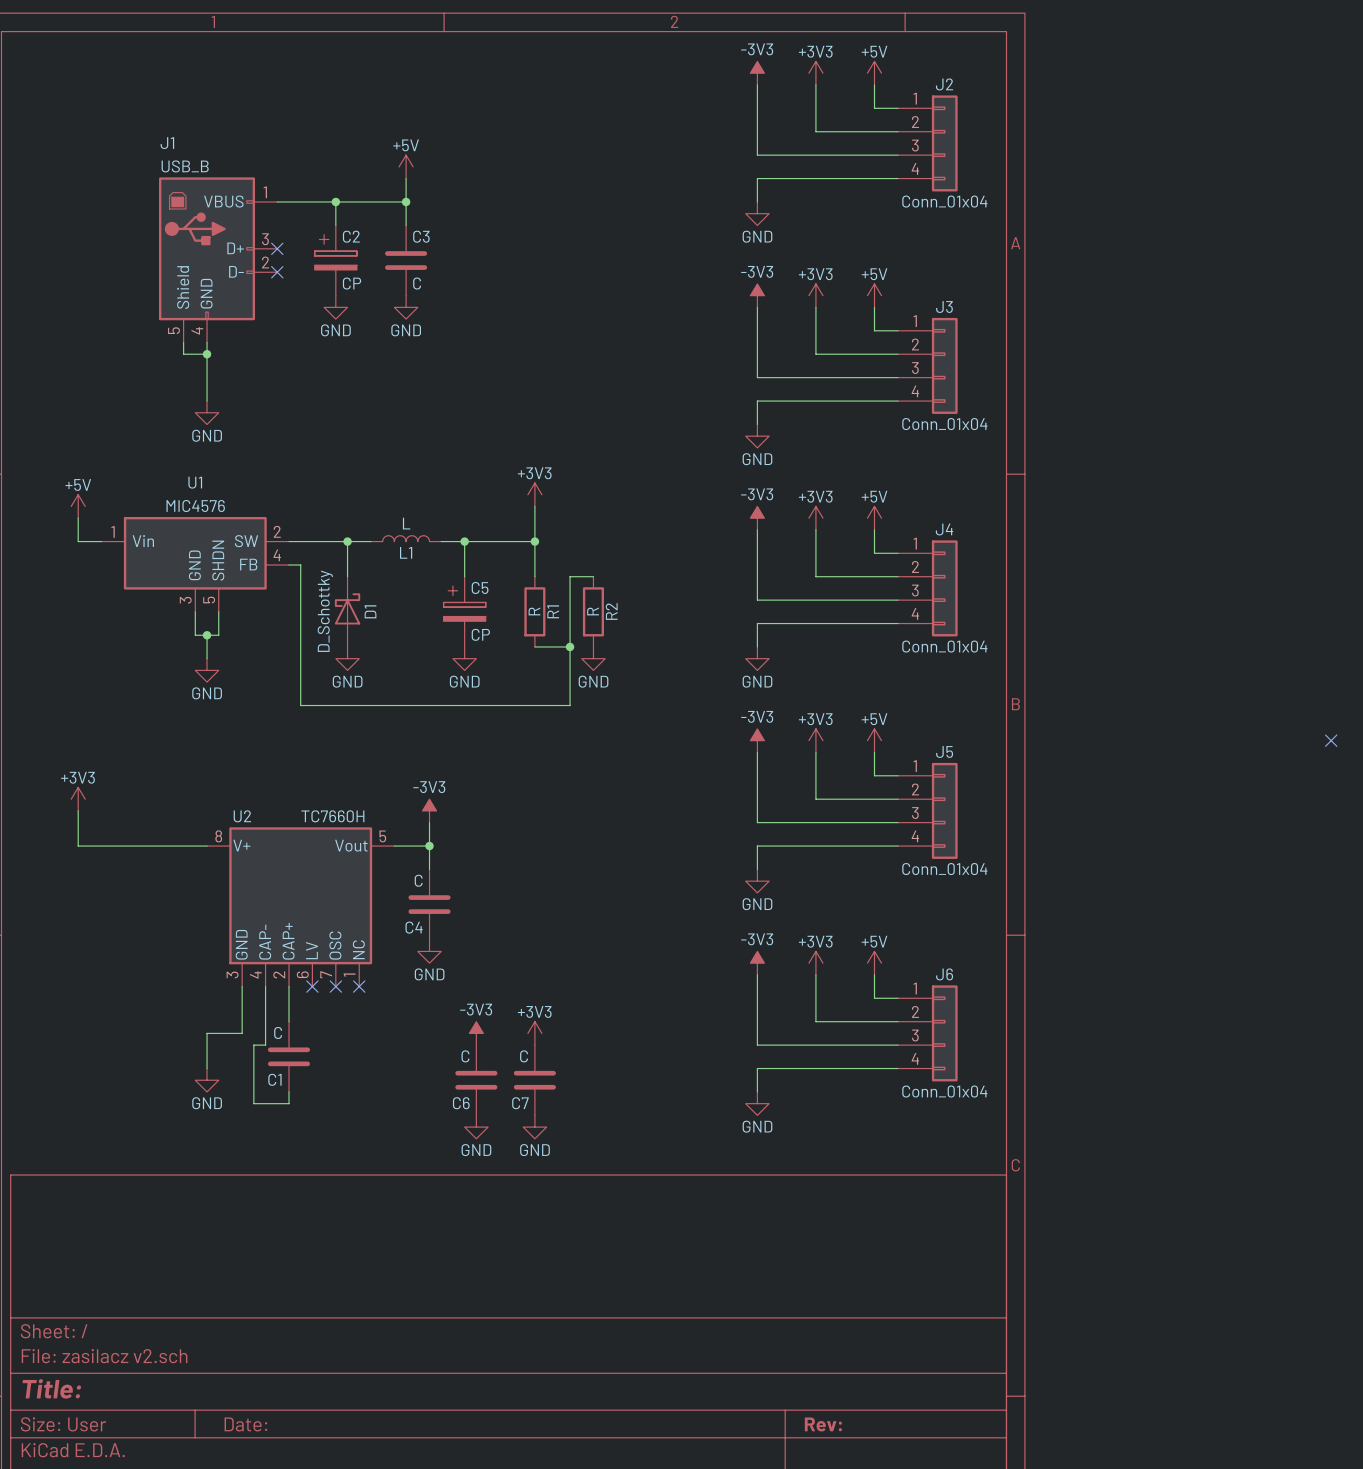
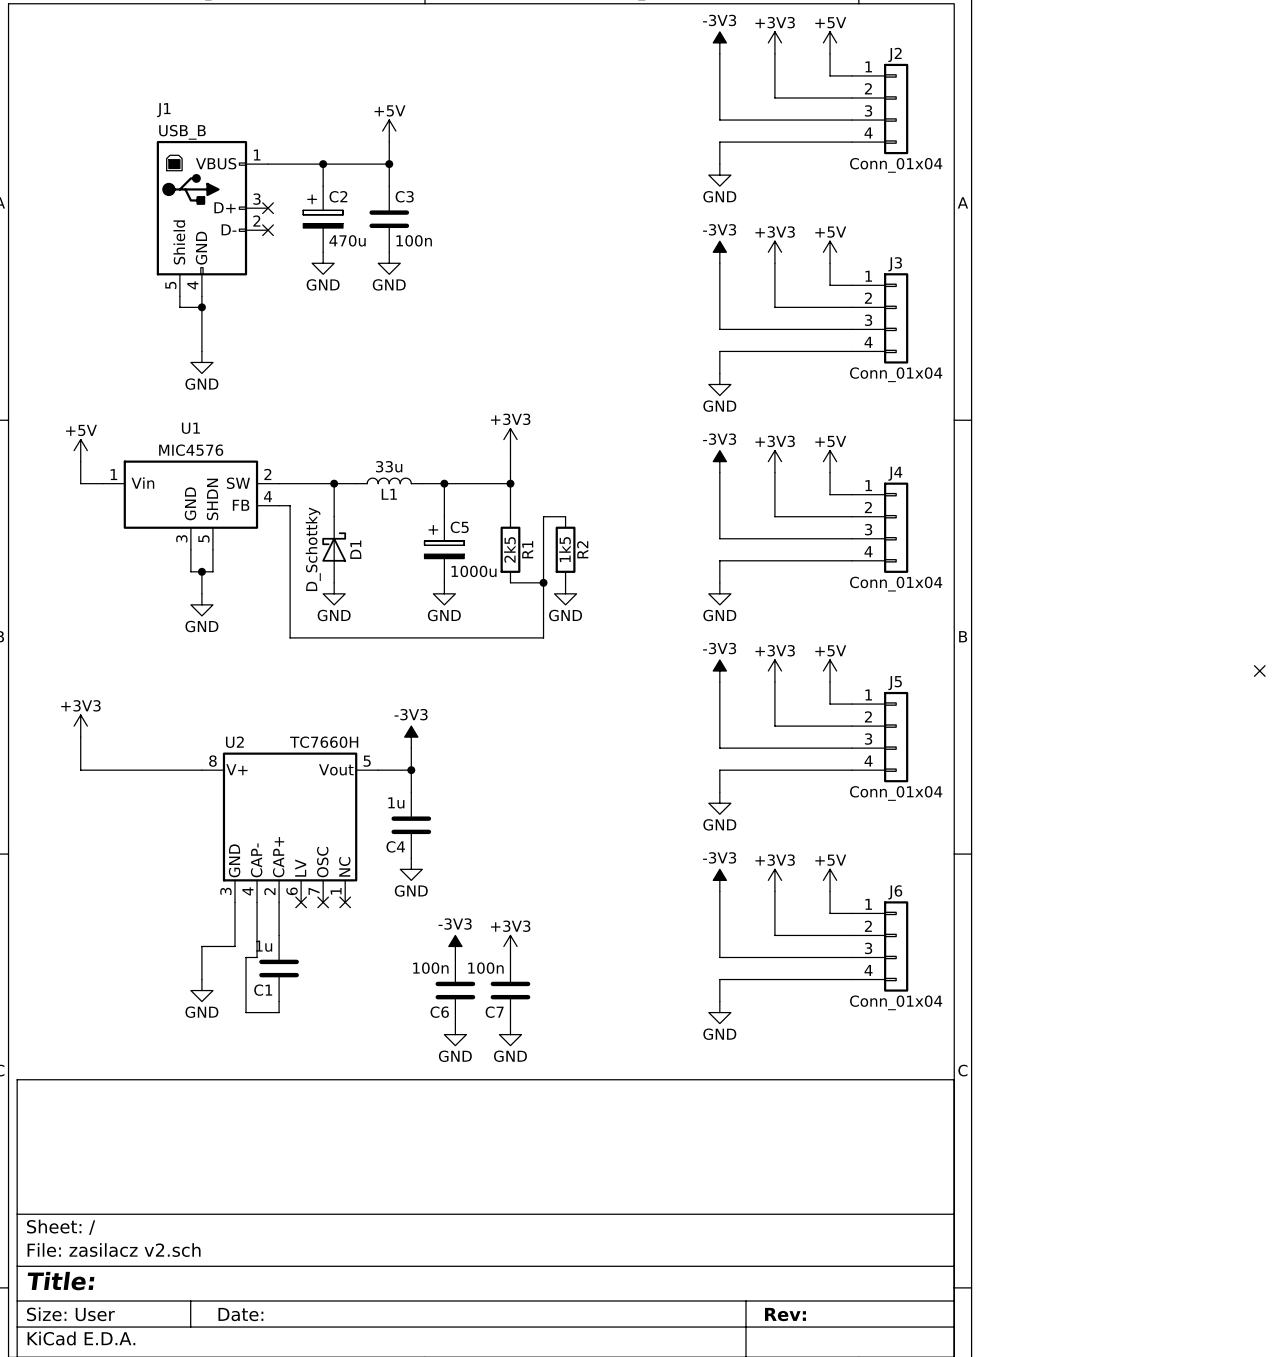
C2 value: CP (352, 283) -> 470u (347, 240)
C3 value: C (417, 283) -> 100n (414, 240)
L1 value: L (406, 523) -> 33u (389, 466)
R1 value: R (534, 611) -> 2k5 (509, 549)
R2 value: R (593, 611) -> 1k5 (565, 549)
C5 value: CP (480, 634) -> 1000u (474, 571)
C4 value: C (418, 880) -> 1u (396, 802)
C1 value: C (278, 1032) -> 1u (264, 946)
C6 value: C (465, 1056) -> 100n (430, 968)
C7 value: C (524, 1056) -> 100n (485, 968)

